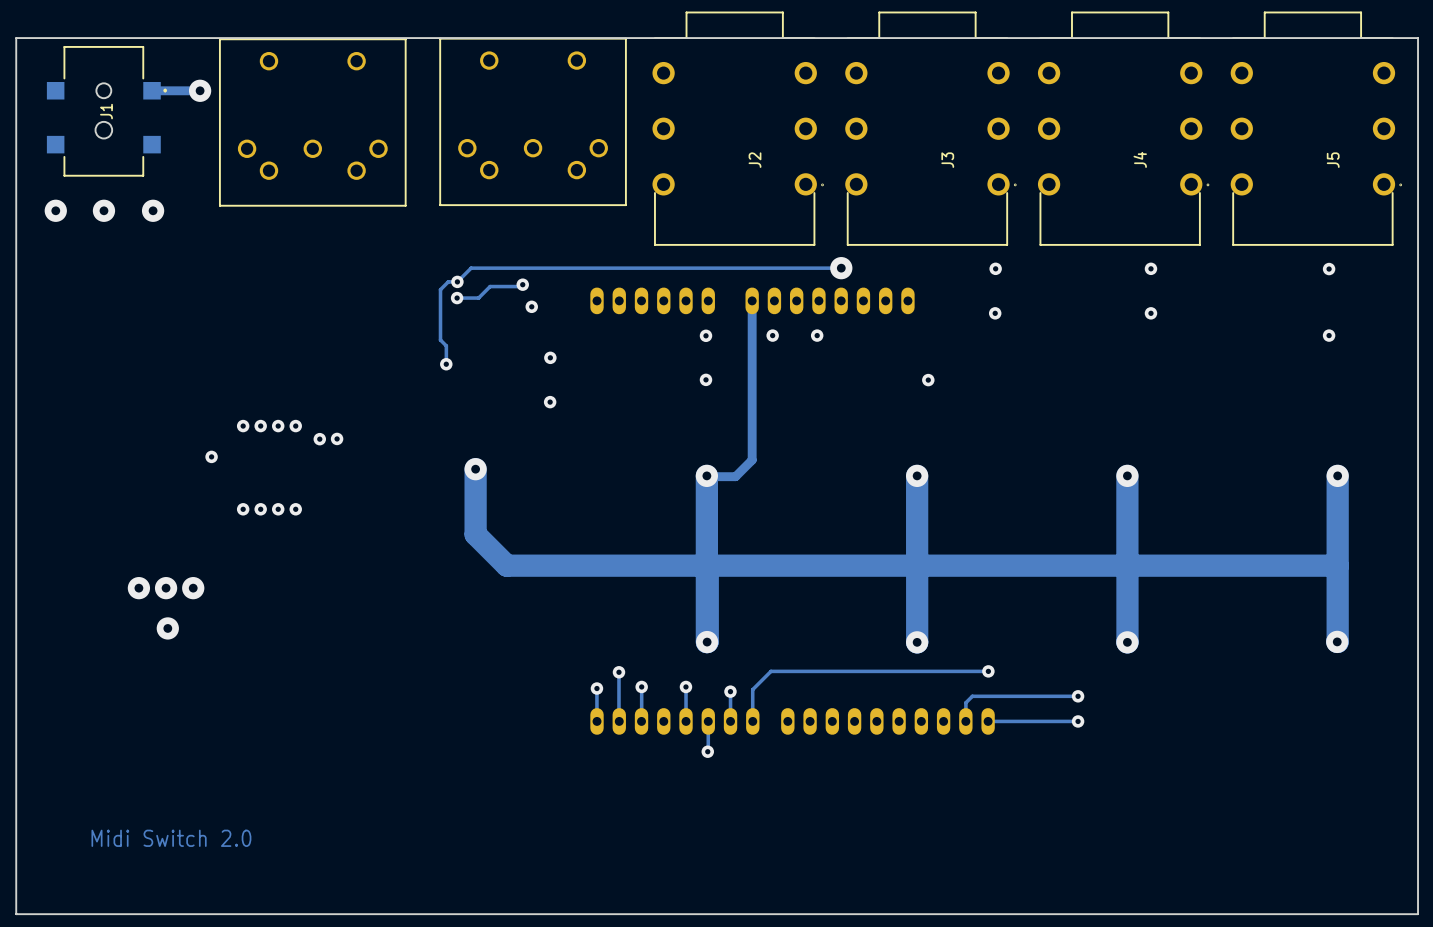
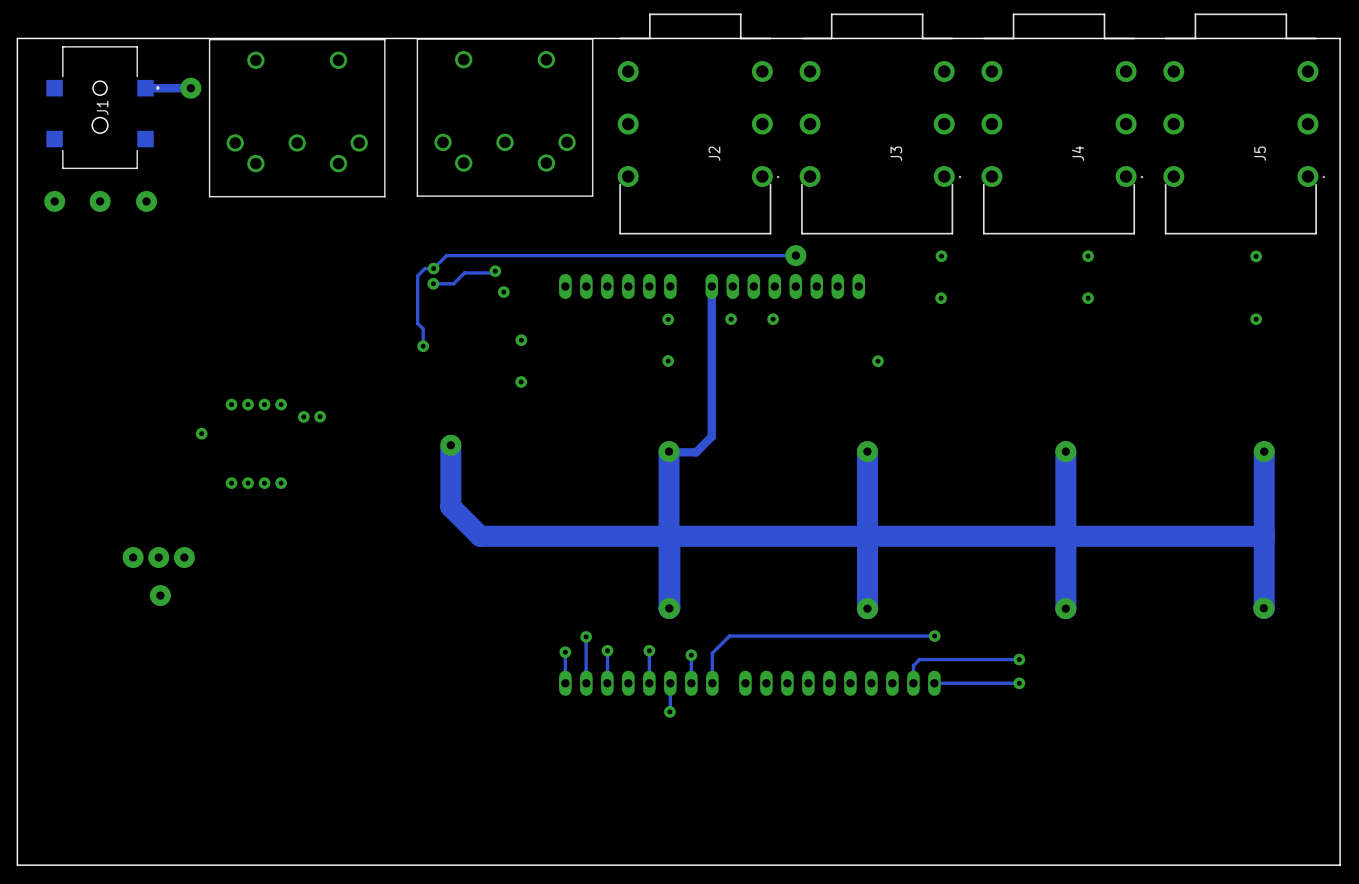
text: Midi Switch 2.0 (171, 838) -> none

